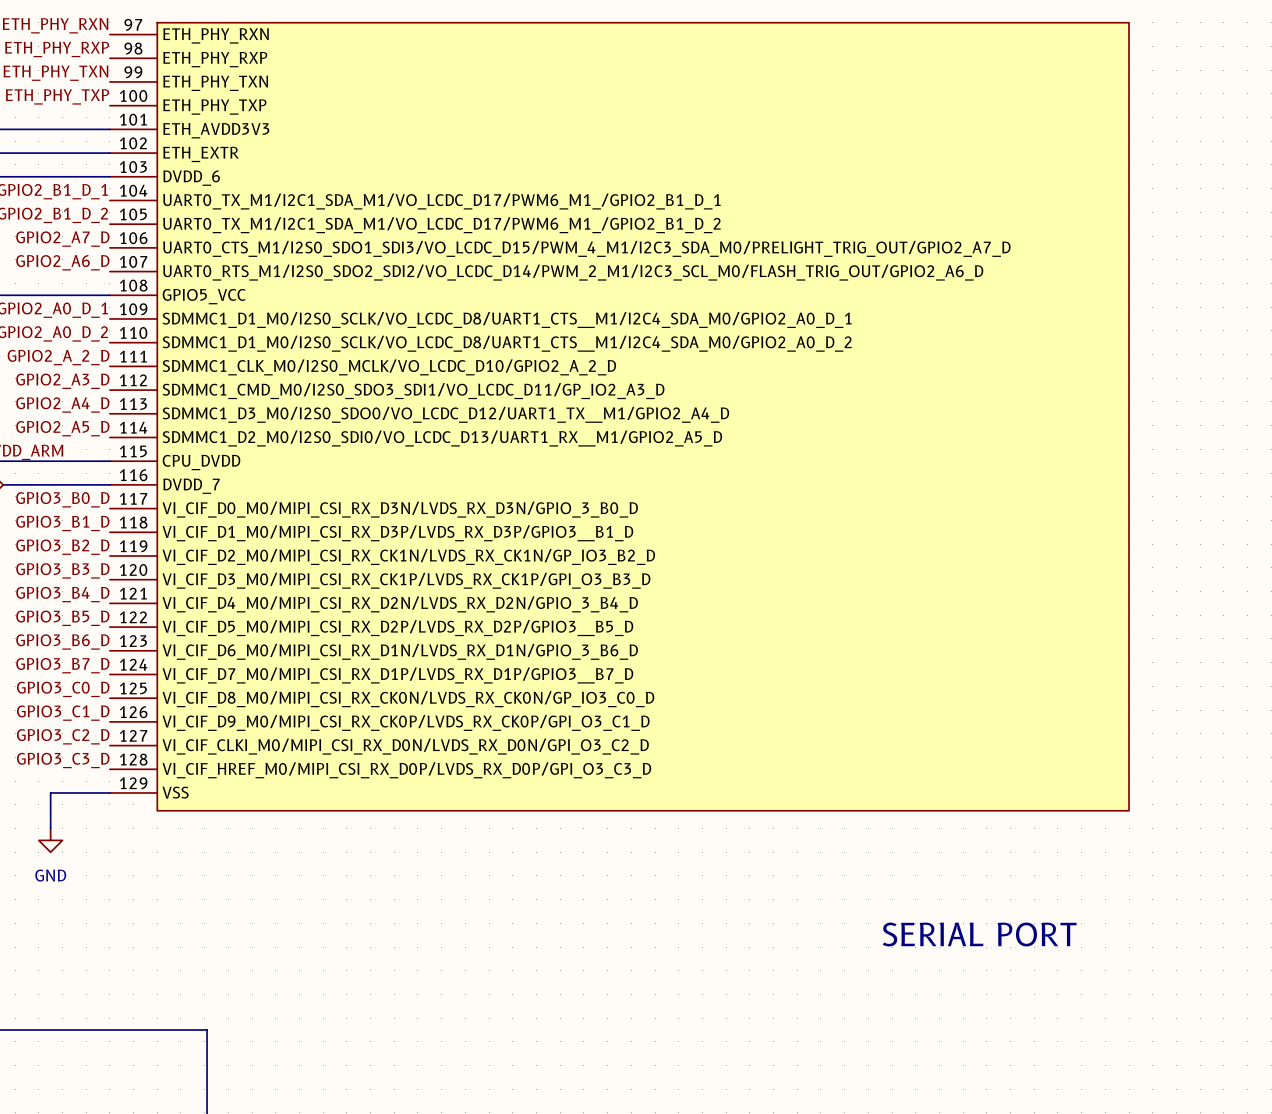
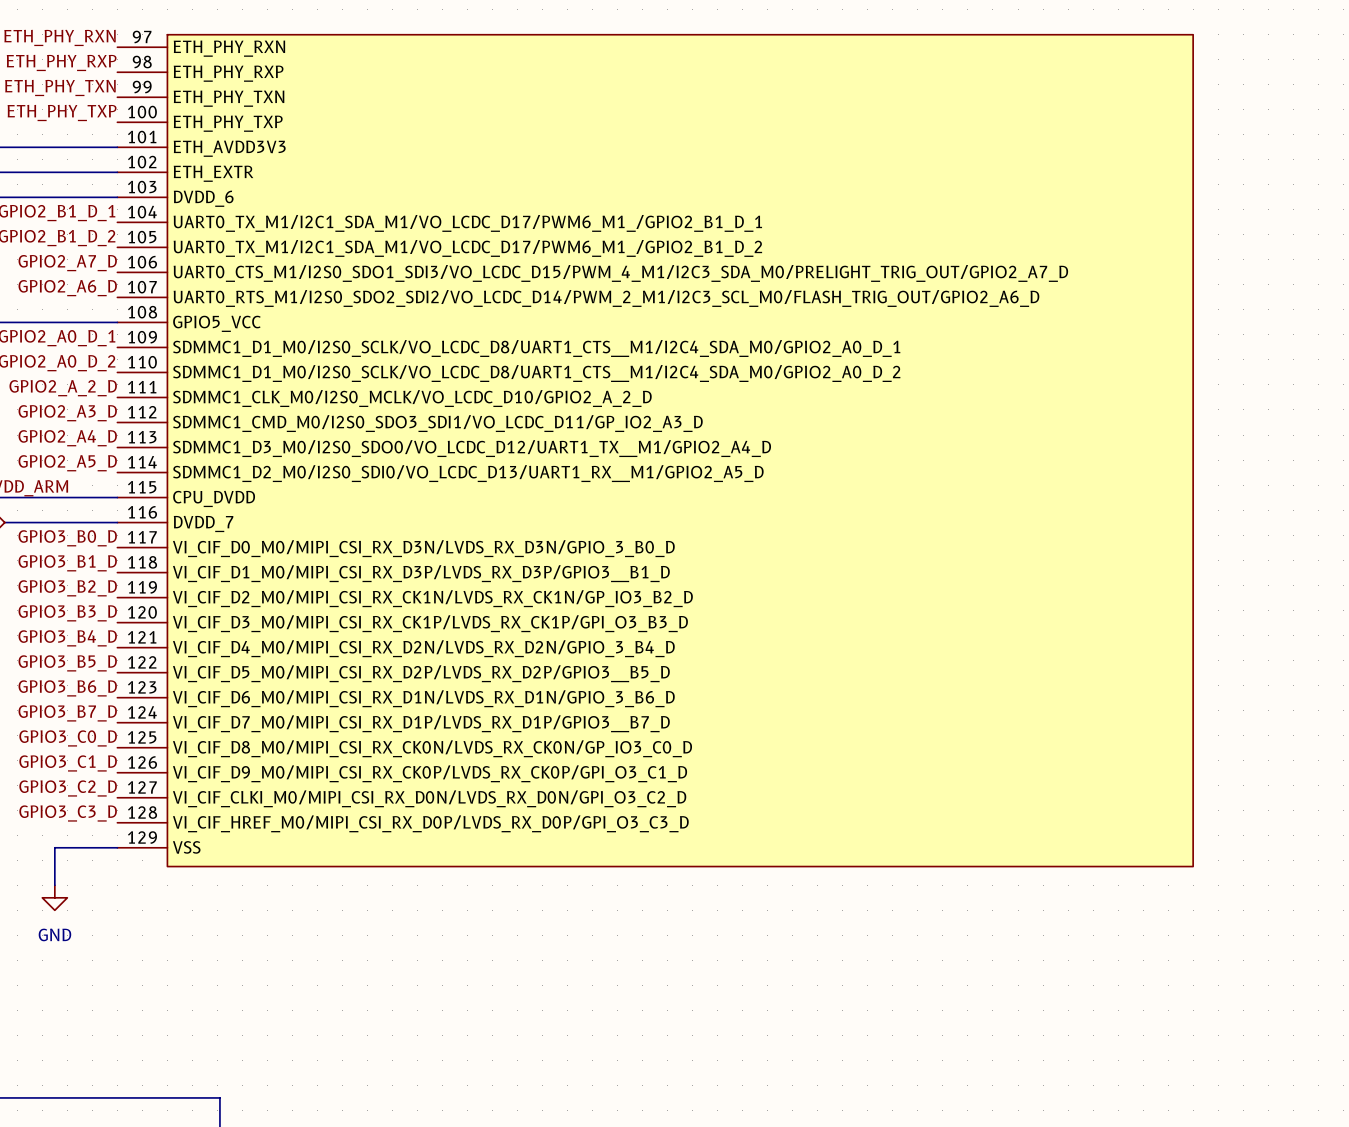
text: SERIAL PORT (979, 934) -> none

